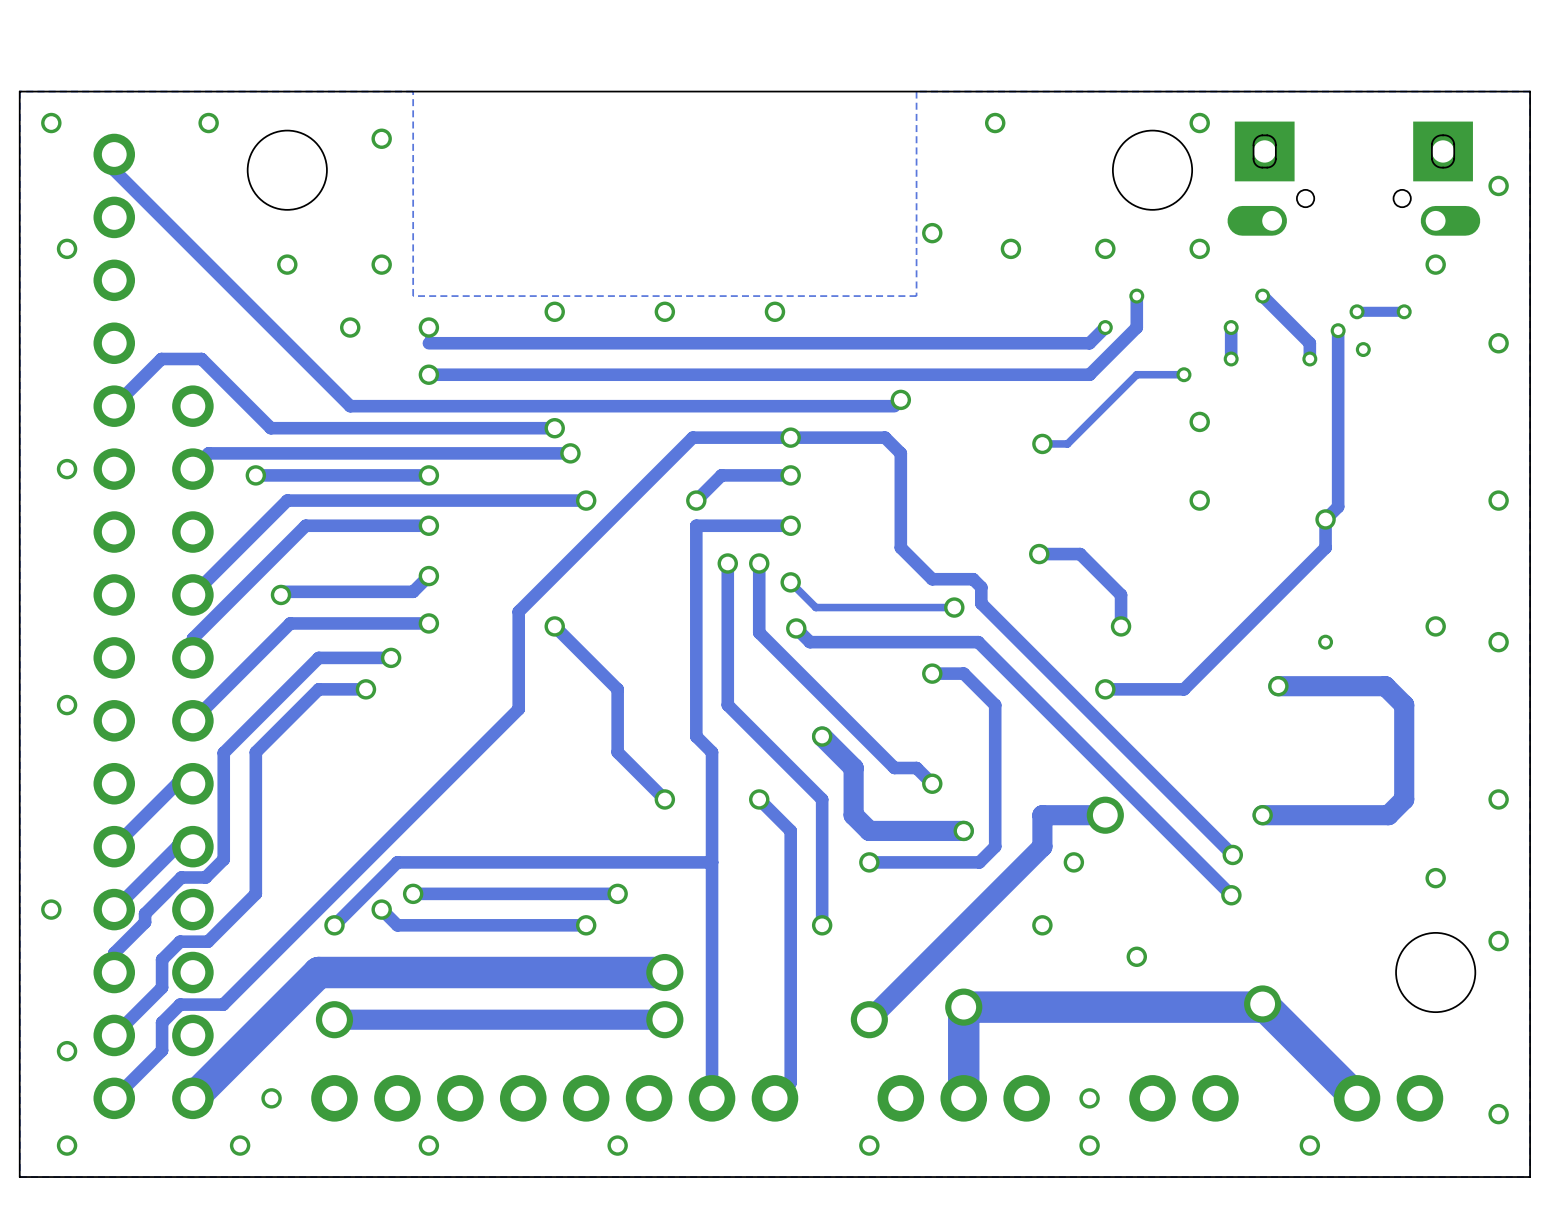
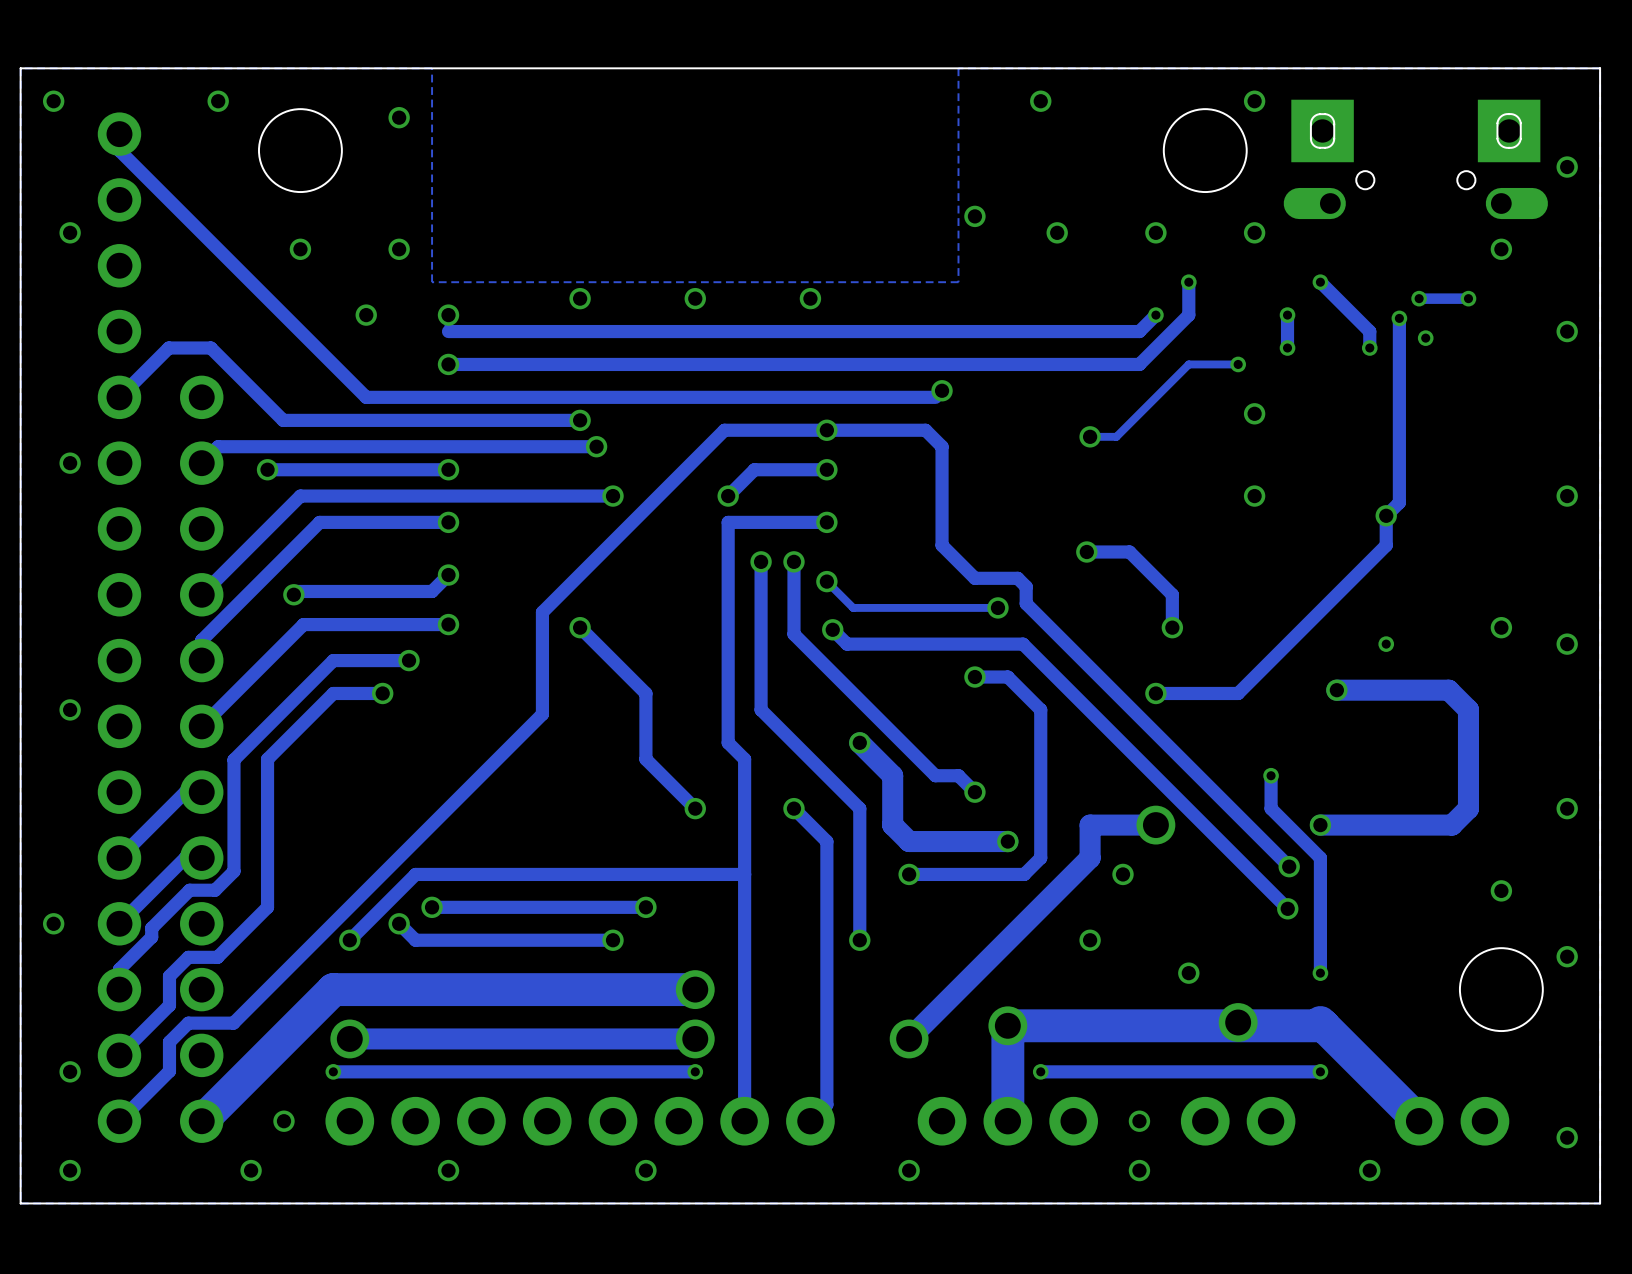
track: none -> (1271, 775) (1271, 808) (1320, 857) (1320, 973)
via: none -> (1271, 775)
via: none -> (1320, 973)
via position: (1262, 1003) -> (1238, 1022)
via: none -> (333, 1071)
track: none -> (695, 1071) (333, 1071)
via: none -> (695, 1071)
via: none -> (1040, 1071)
track: none -> (1320, 1071) (1040, 1071)
via: none -> (1320, 1071)

